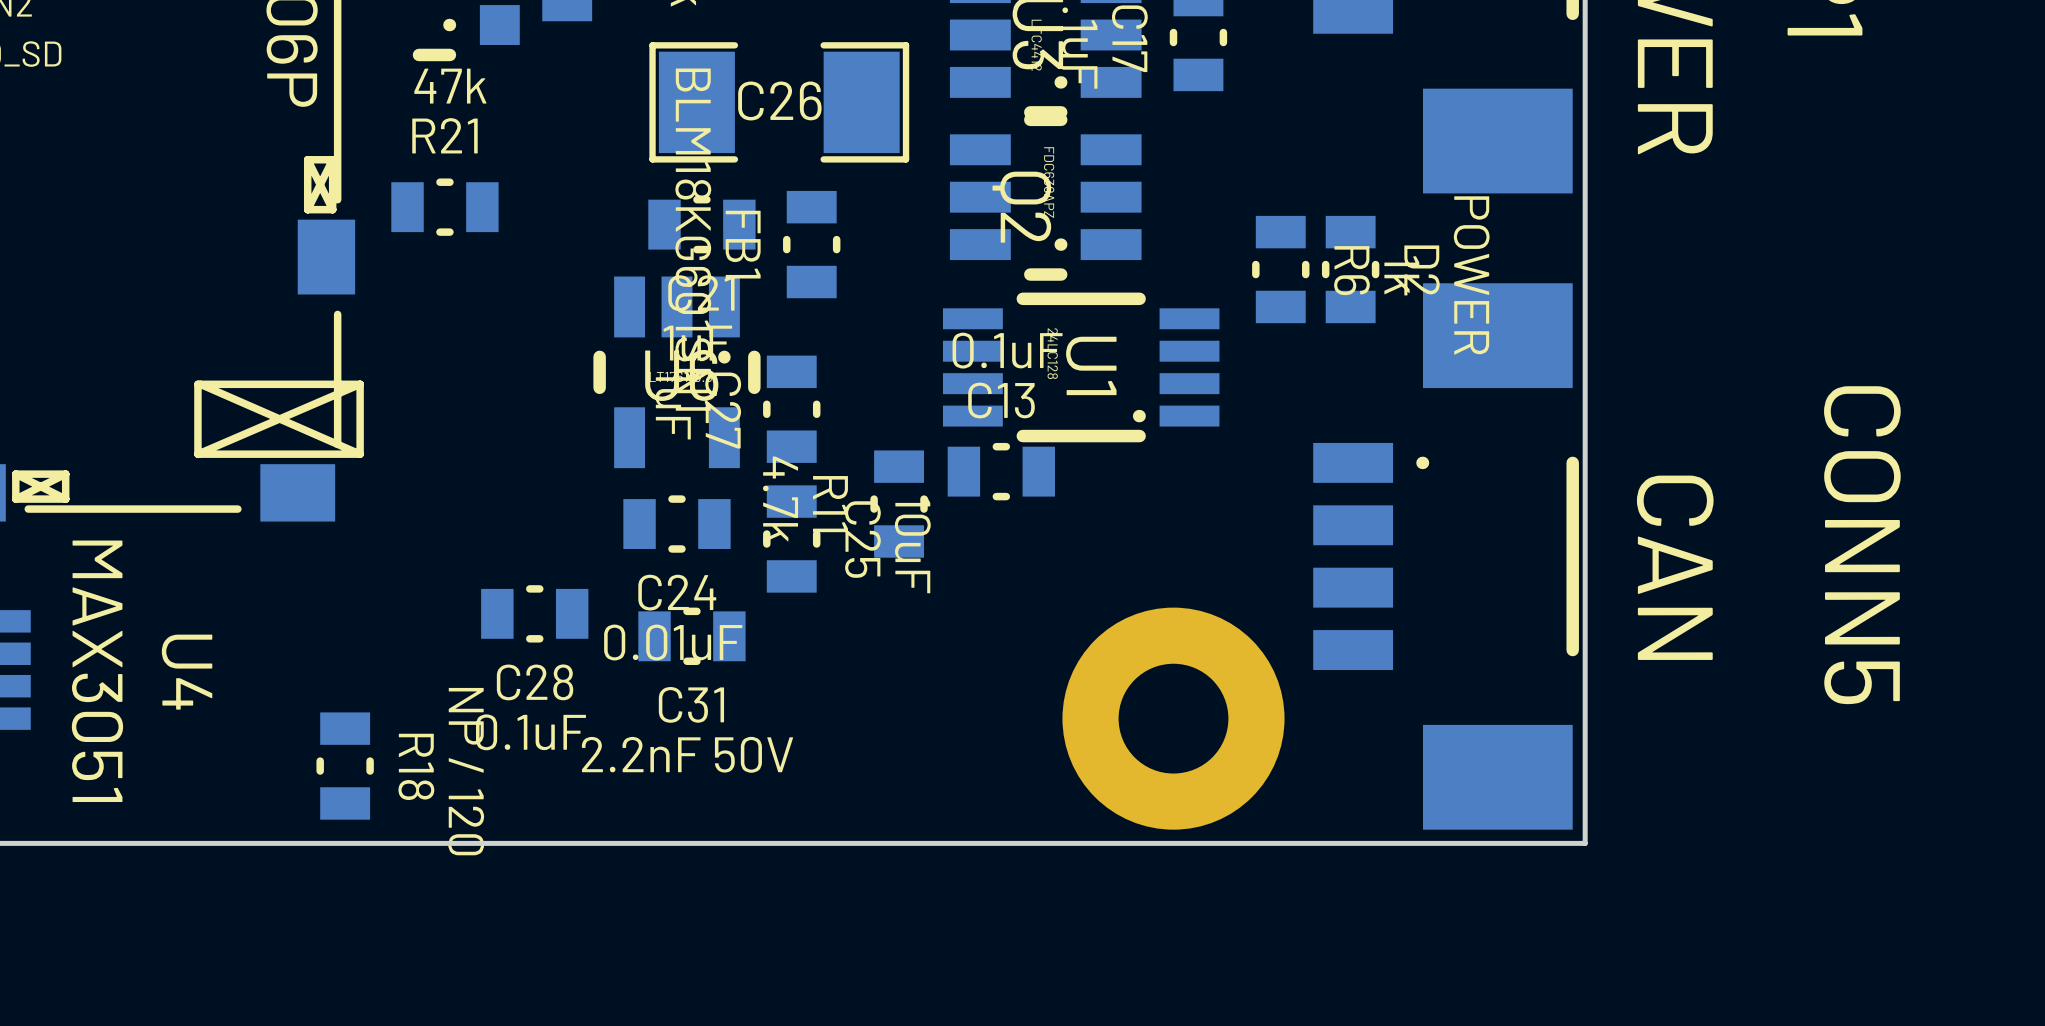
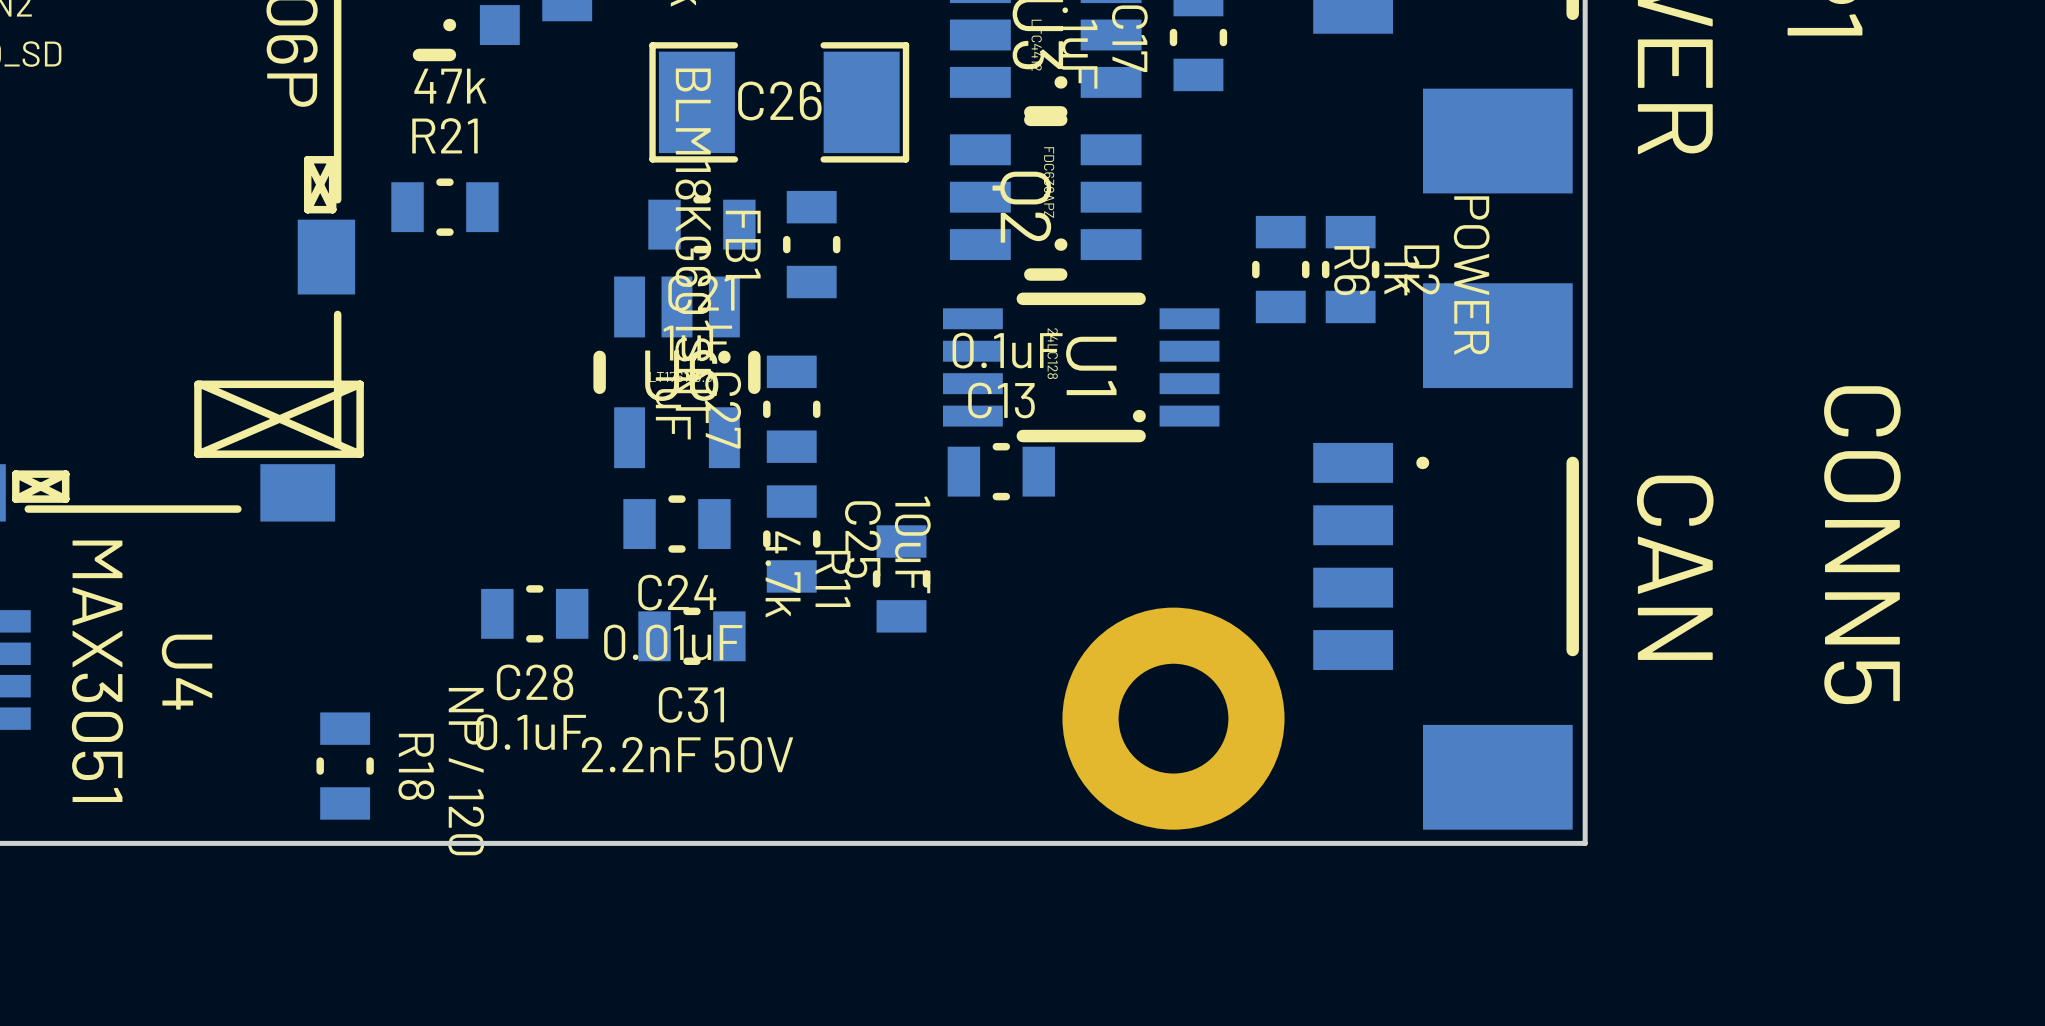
R11 position: (899, 504) -> (901, 578)

